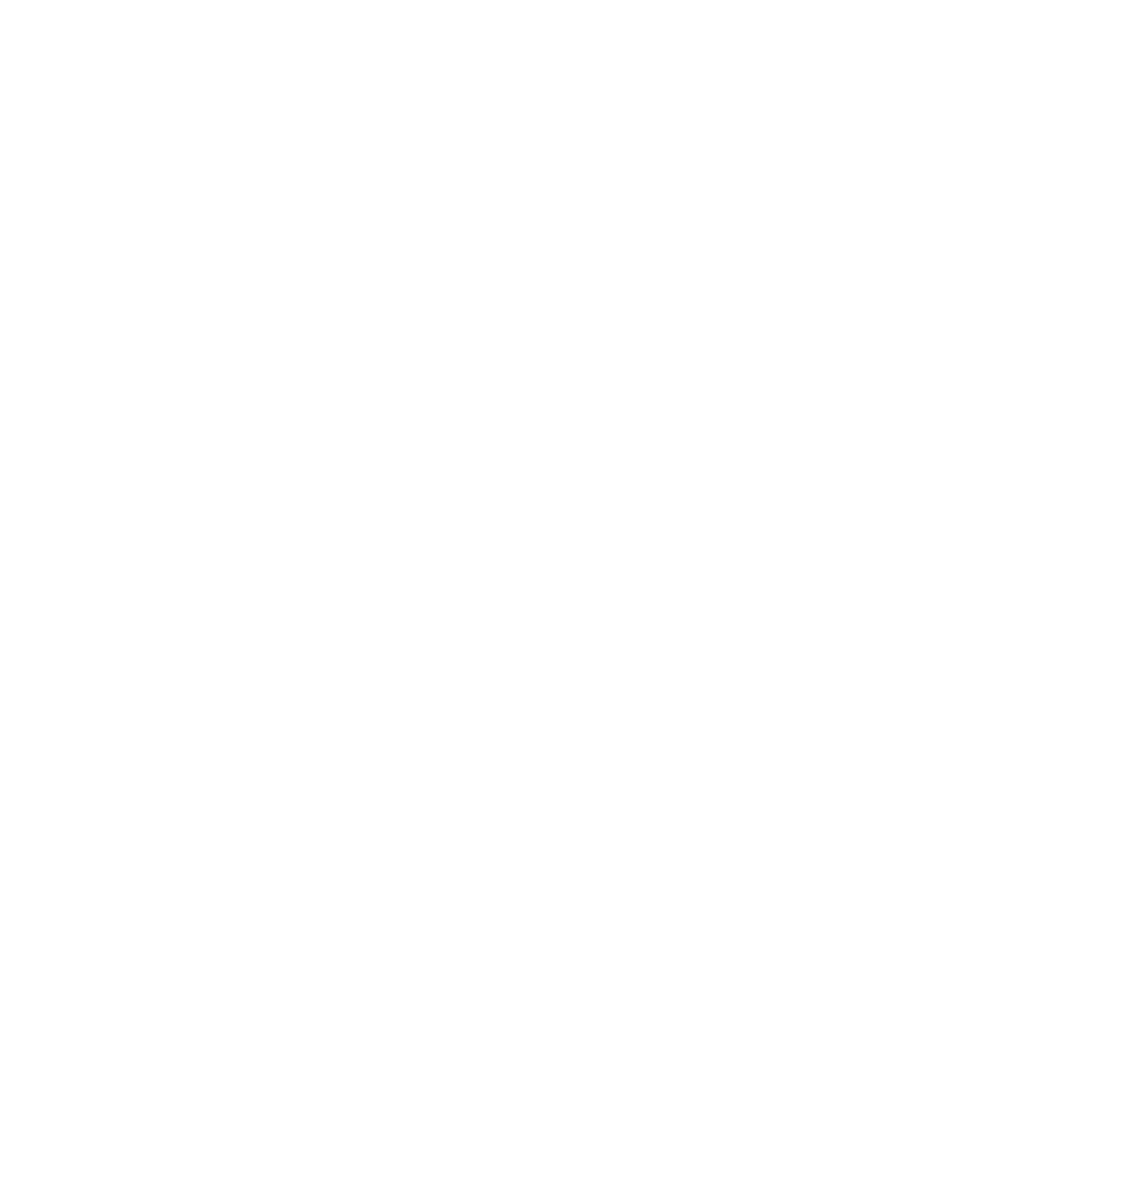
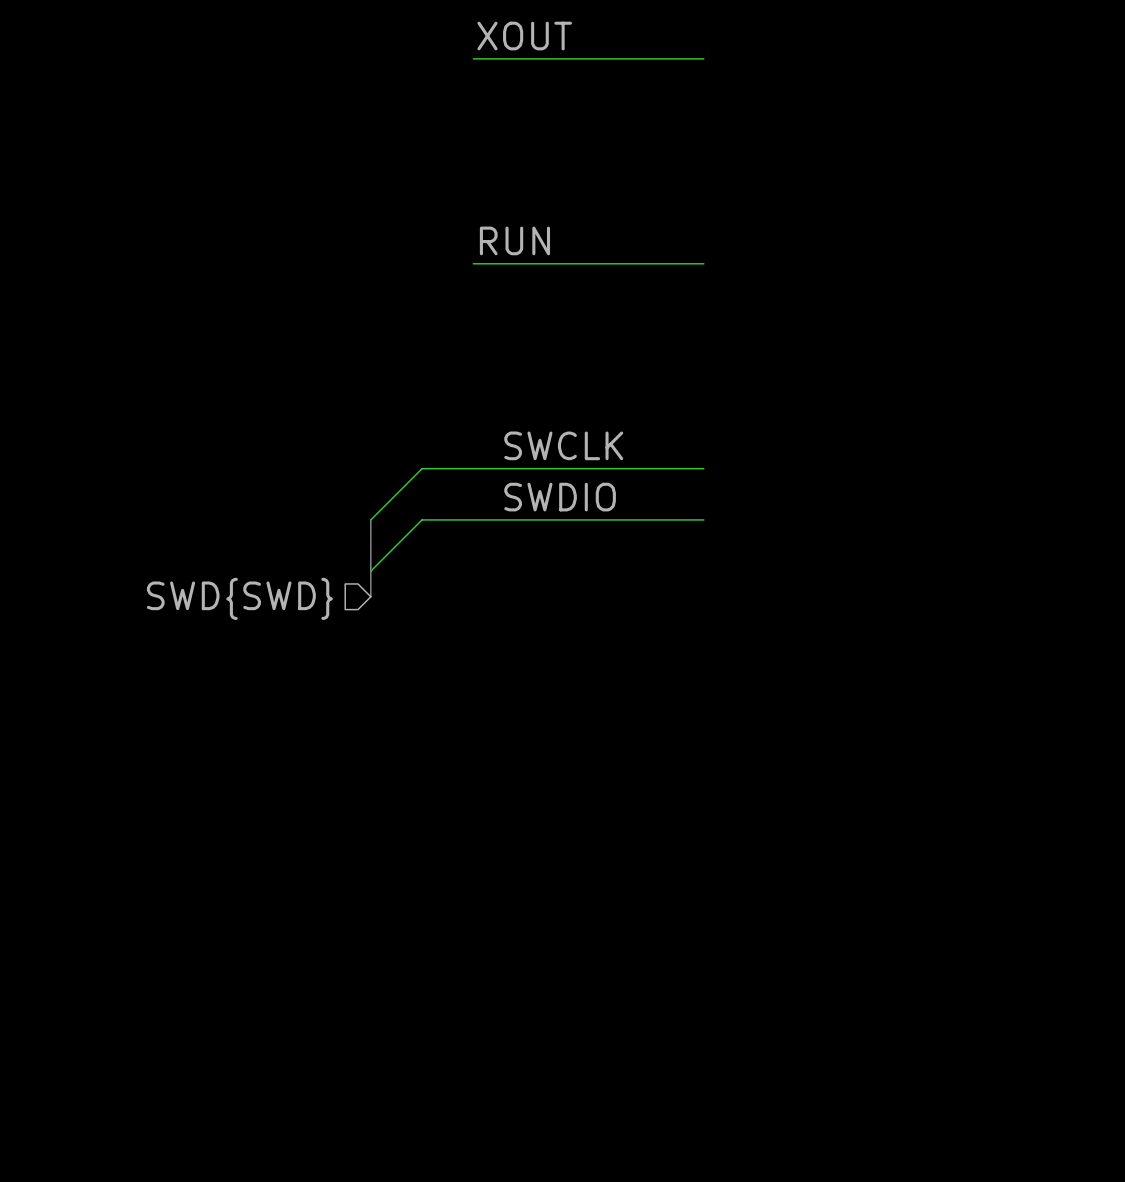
label: none -> XOUT (524, 36)
wire: none -> (473, 58) (703, 58)
label: none -> RUN (514, 240)
wire: none -> (473, 263) (703, 263)
label: none -> SWCLK (563, 445)
wire: none -> (703, 468) (422, 468) (370, 519)
label: none -> SWDIO (560, 497)
bus: none -> (370, 519) (370, 596)
wire: none -> (703, 519) (422, 519) (370, 571)
hierarchical label: none -> SWD{SWD} (239, 598)

